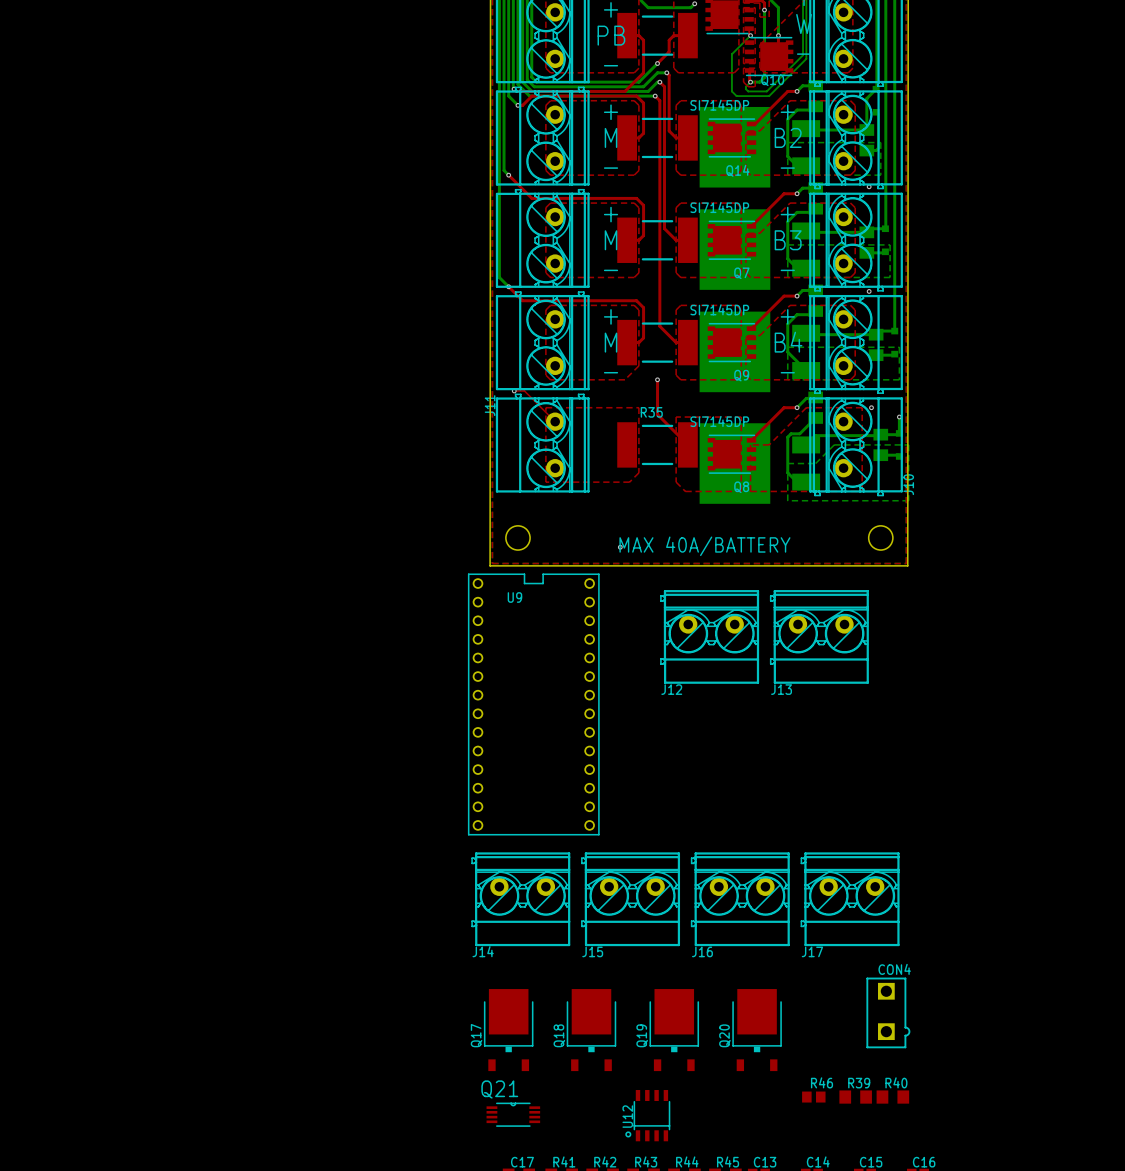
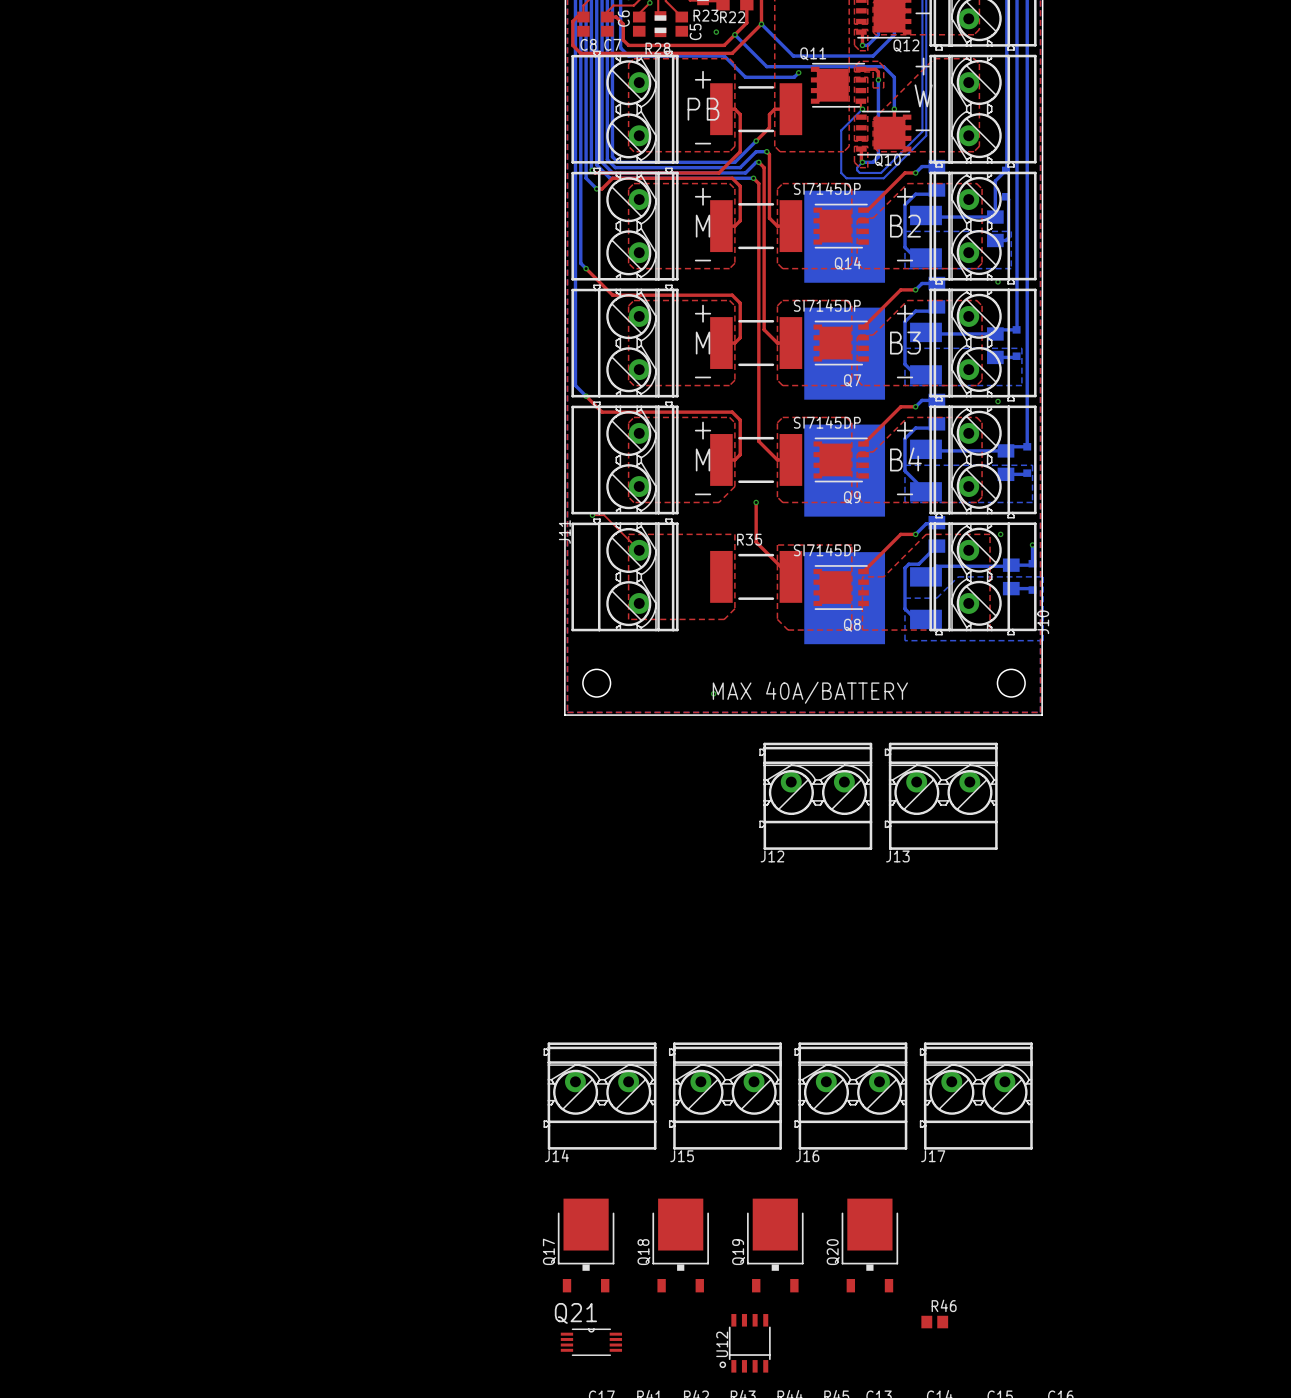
U9: (533, 704) -> none
CON4: (888, 1012) -> none
R39: (855, 1097) -> none
R40: (892, 1097) -> none

